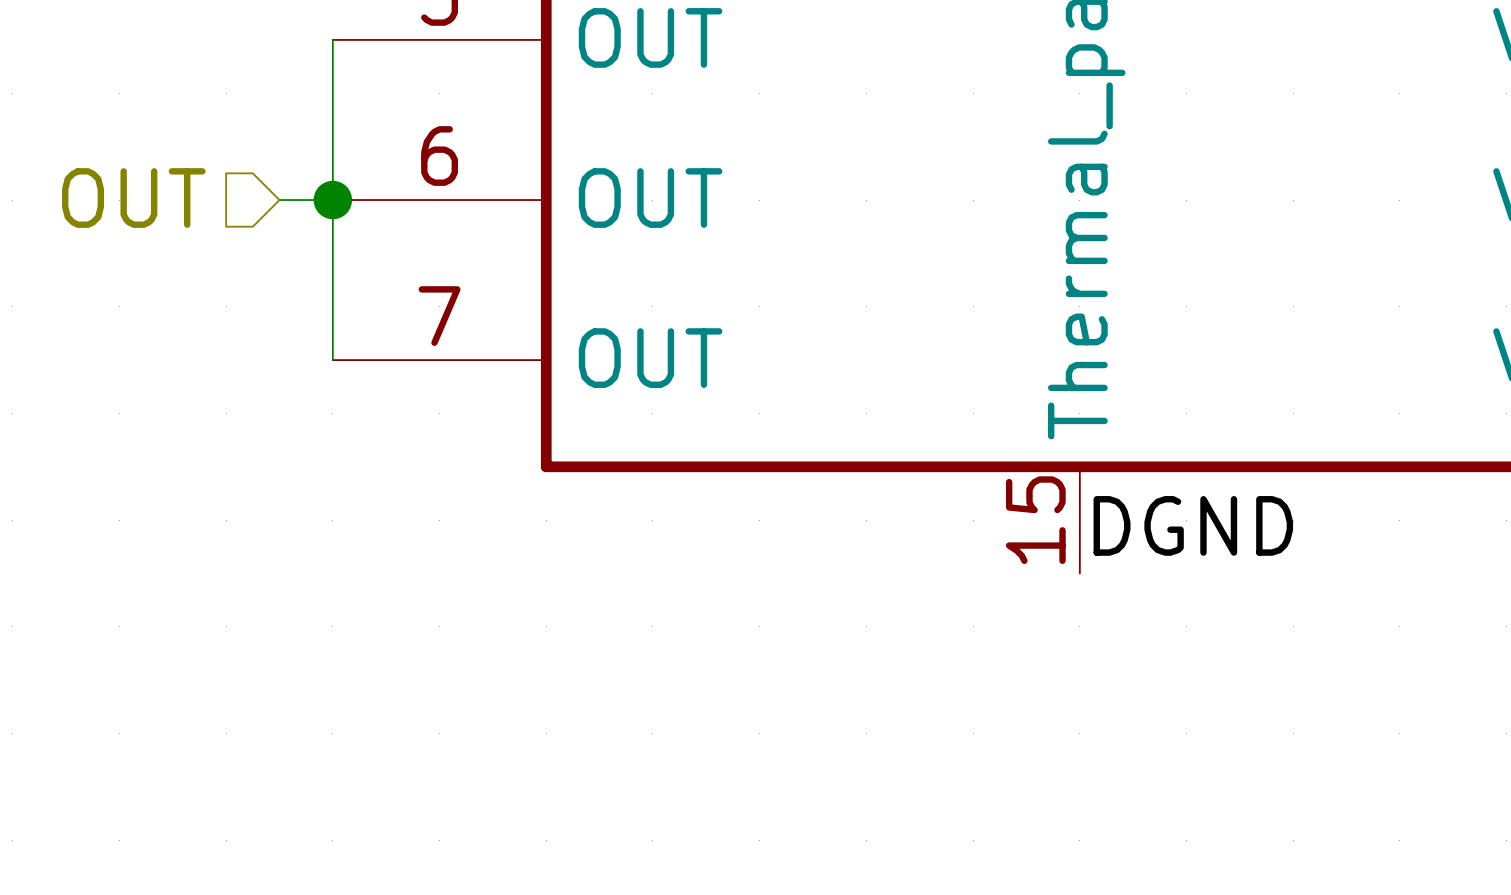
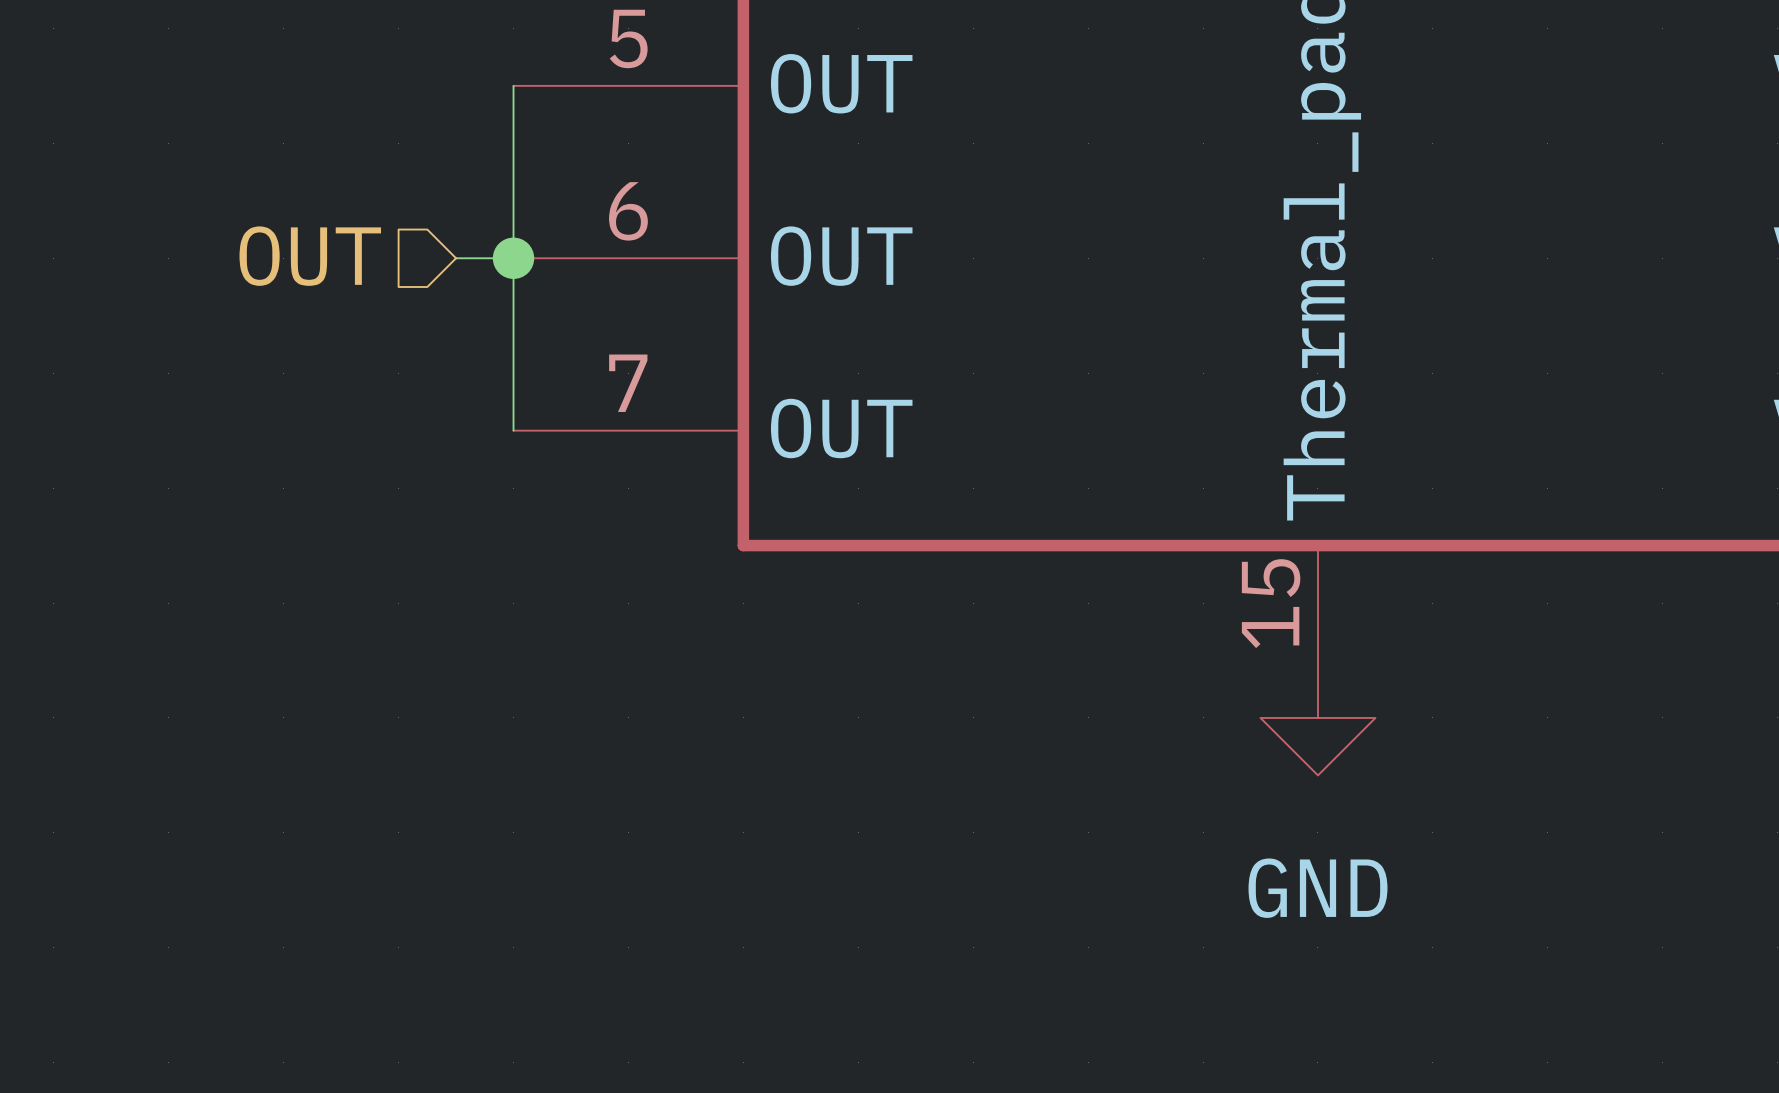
label: DGND (1193, 525) -> none
power symbol: none -> GND (1317, 717)

